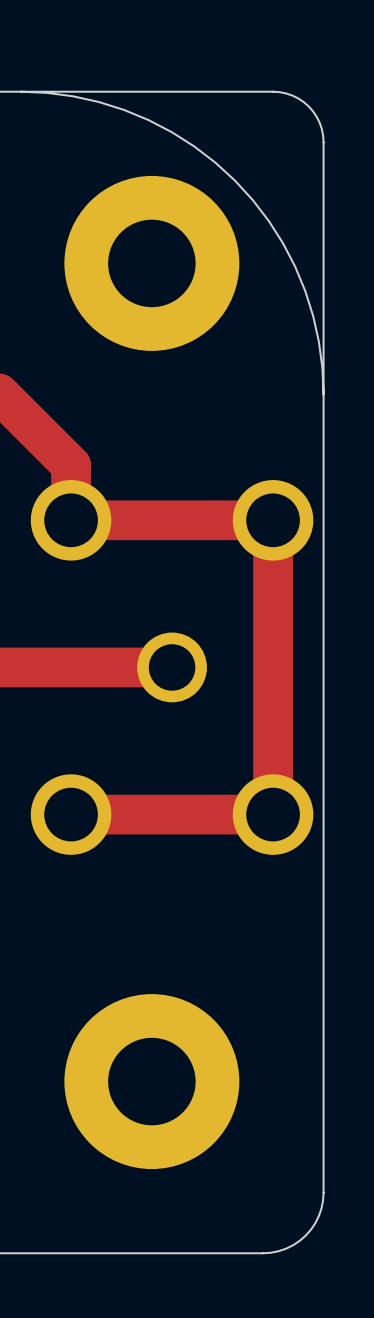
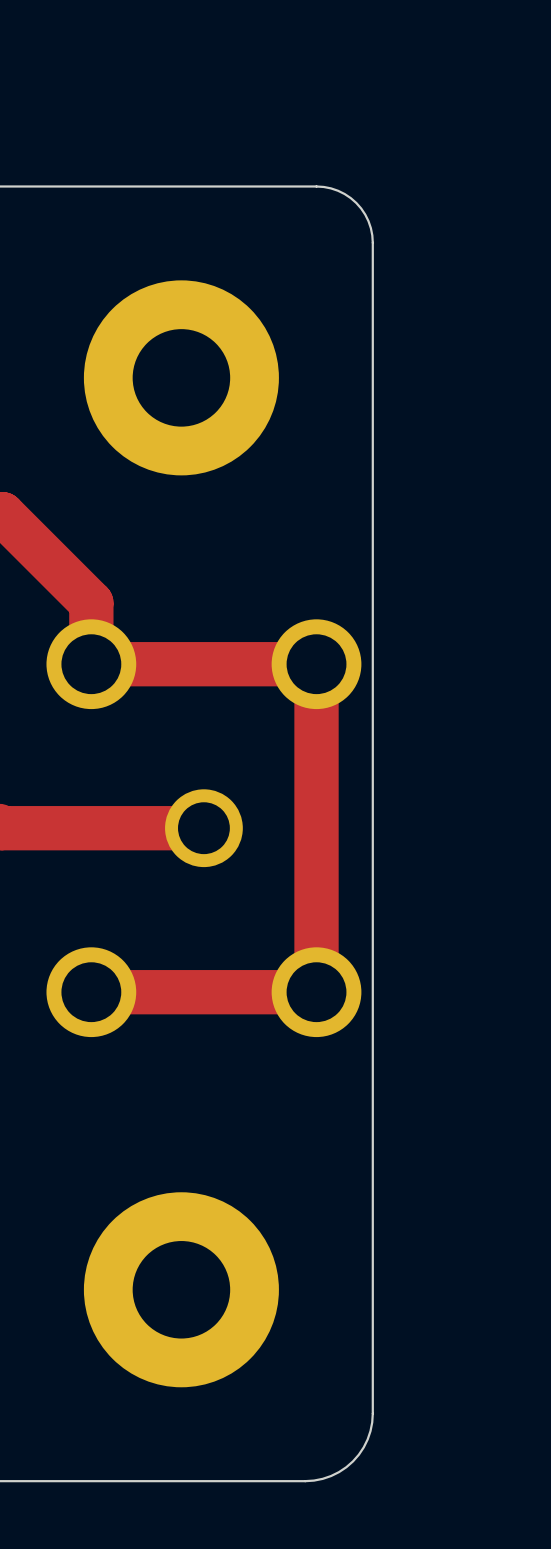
board edge: (20, 91) (73, 96) (124, 109) (172, 132) (215, 162) (234, 180) (252, 199) (282, 243) (305, 291) (318, 342) (323, 394) -> none

